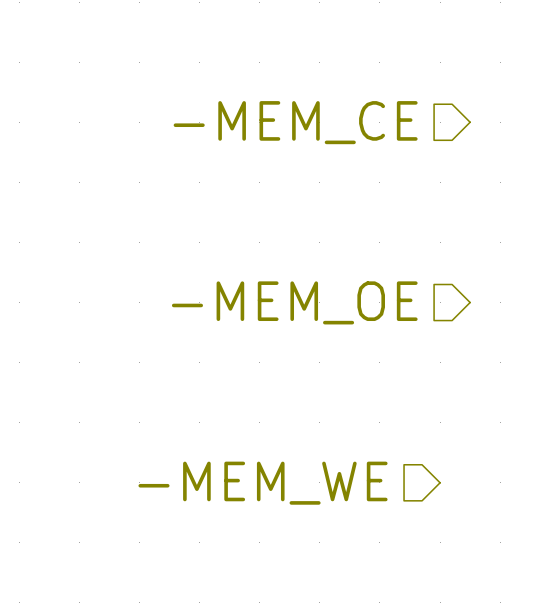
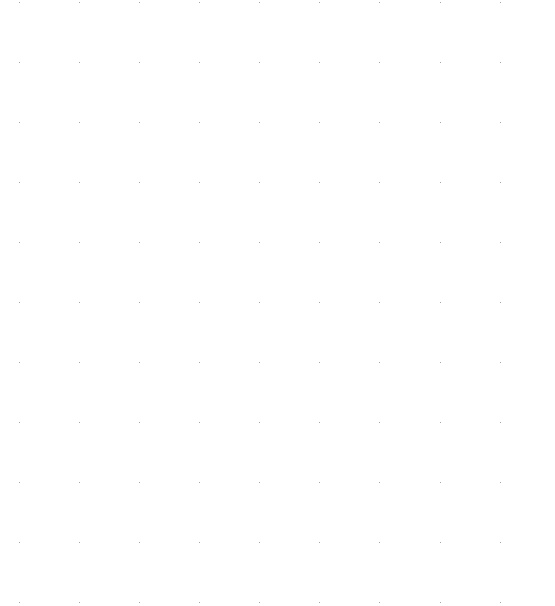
hierarchical label: -MEM_CE (295, 122) -> none
hierarchical label: -MEM_OE (294, 302) -> none
hierarchical label: -MEM_WE (263, 483) -> none

